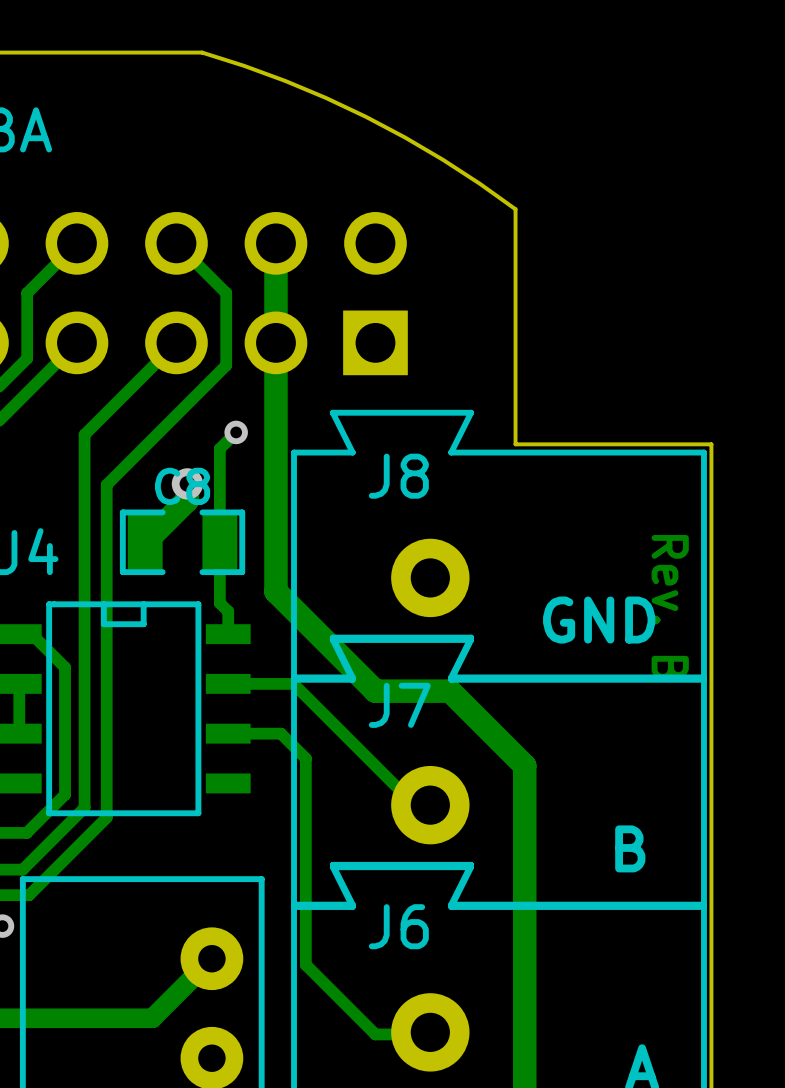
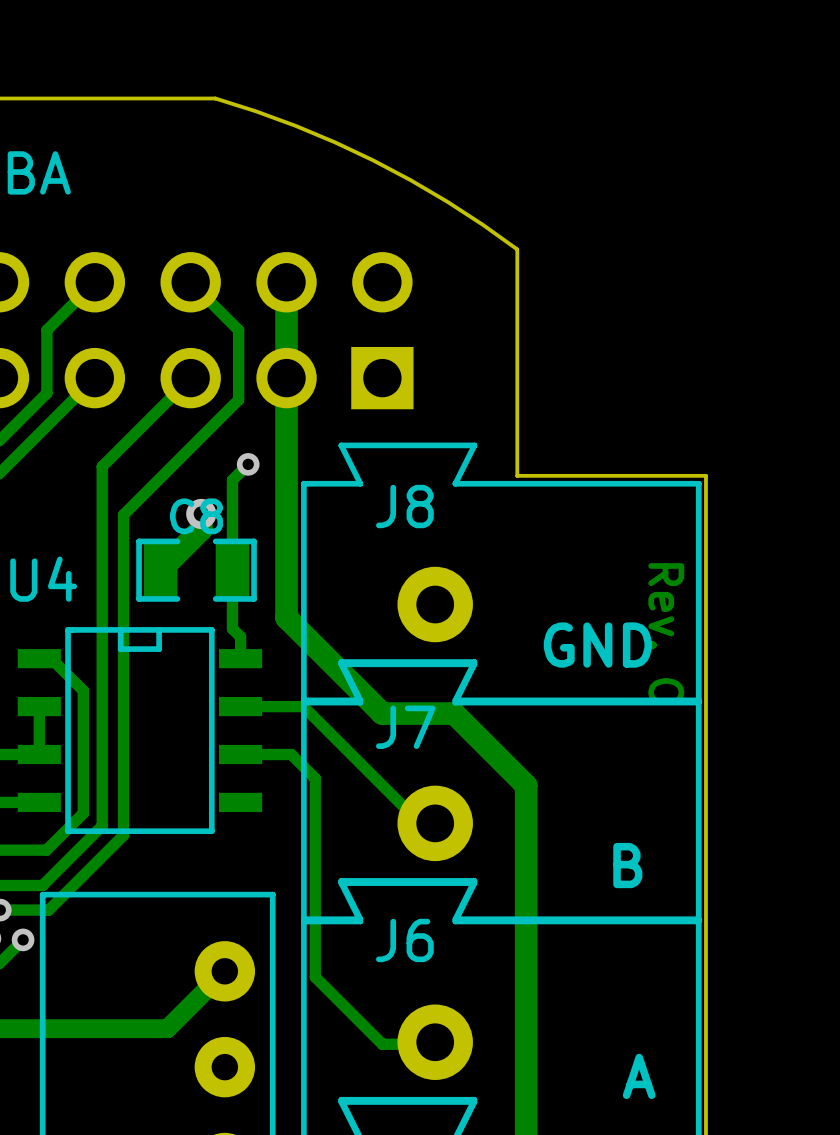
text: Rev. B (670, 607) -> Rev. C (666, 632)

